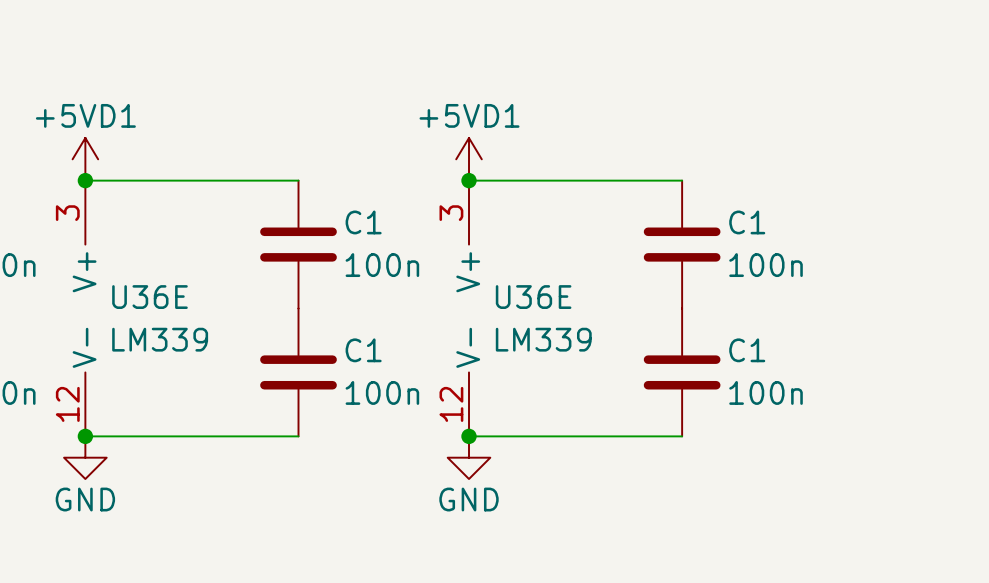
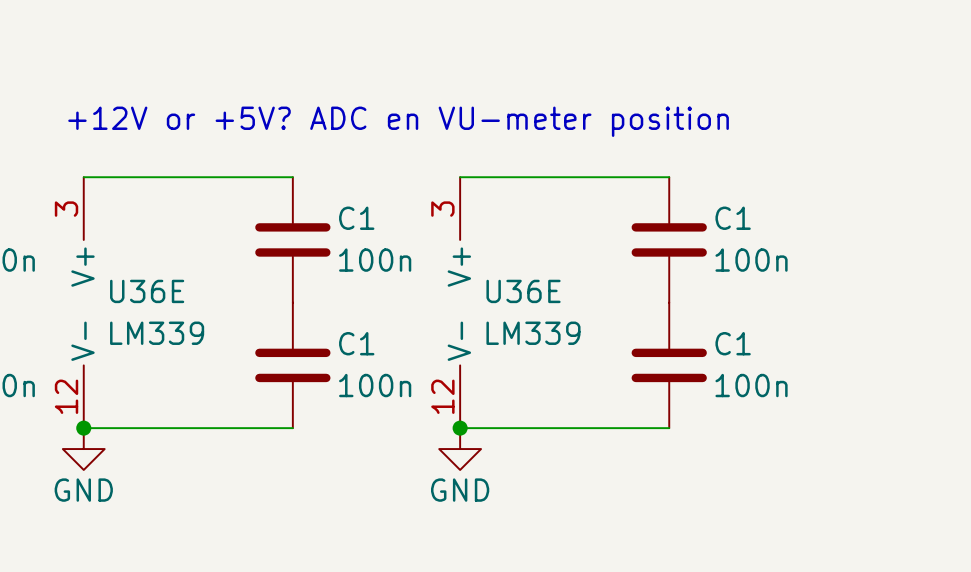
text: none -> +12V or +5V? ADC en VU-meter position (398, 121)
power symbol: +5VD1 (85, 159) -> none
power symbol: +5VD1 (469, 159) -> none
junction: (85, 180) -> none
junction: (469, 180) -> none

